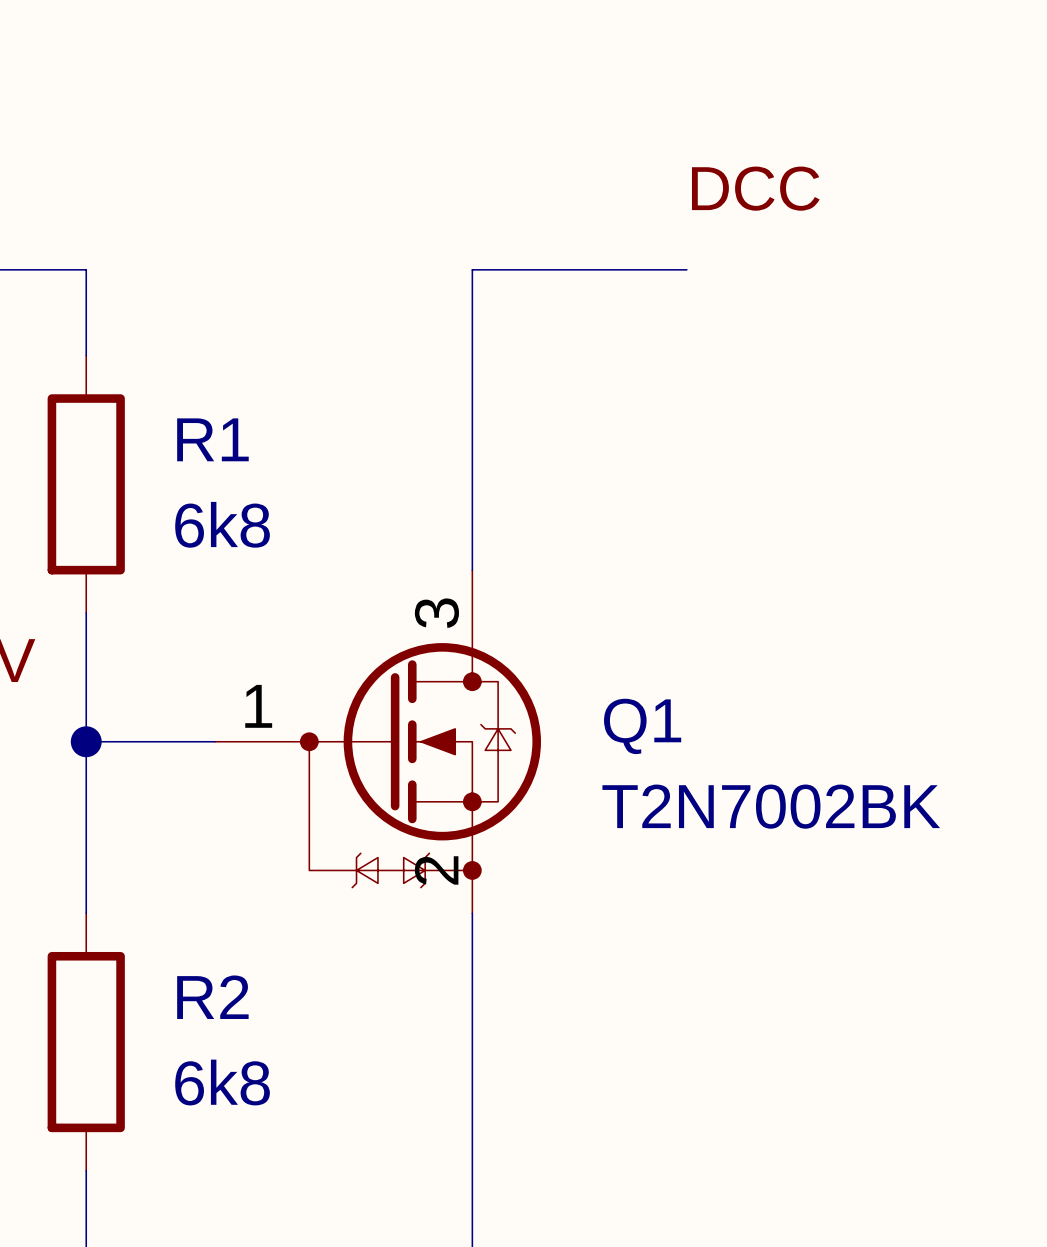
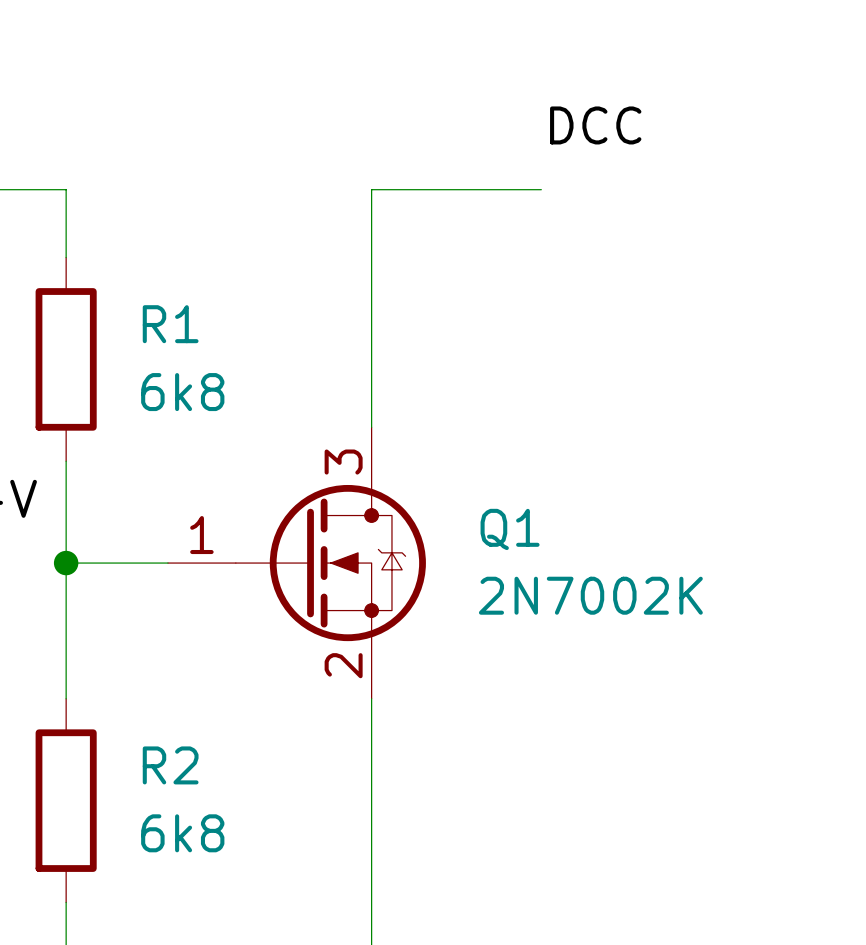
Q1 symbol: [214, 570, 541, 914] -> [167, 427, 426, 699]
Q1 value: T2N7002BK (771, 806) -> 2N7002K (590, 595)

